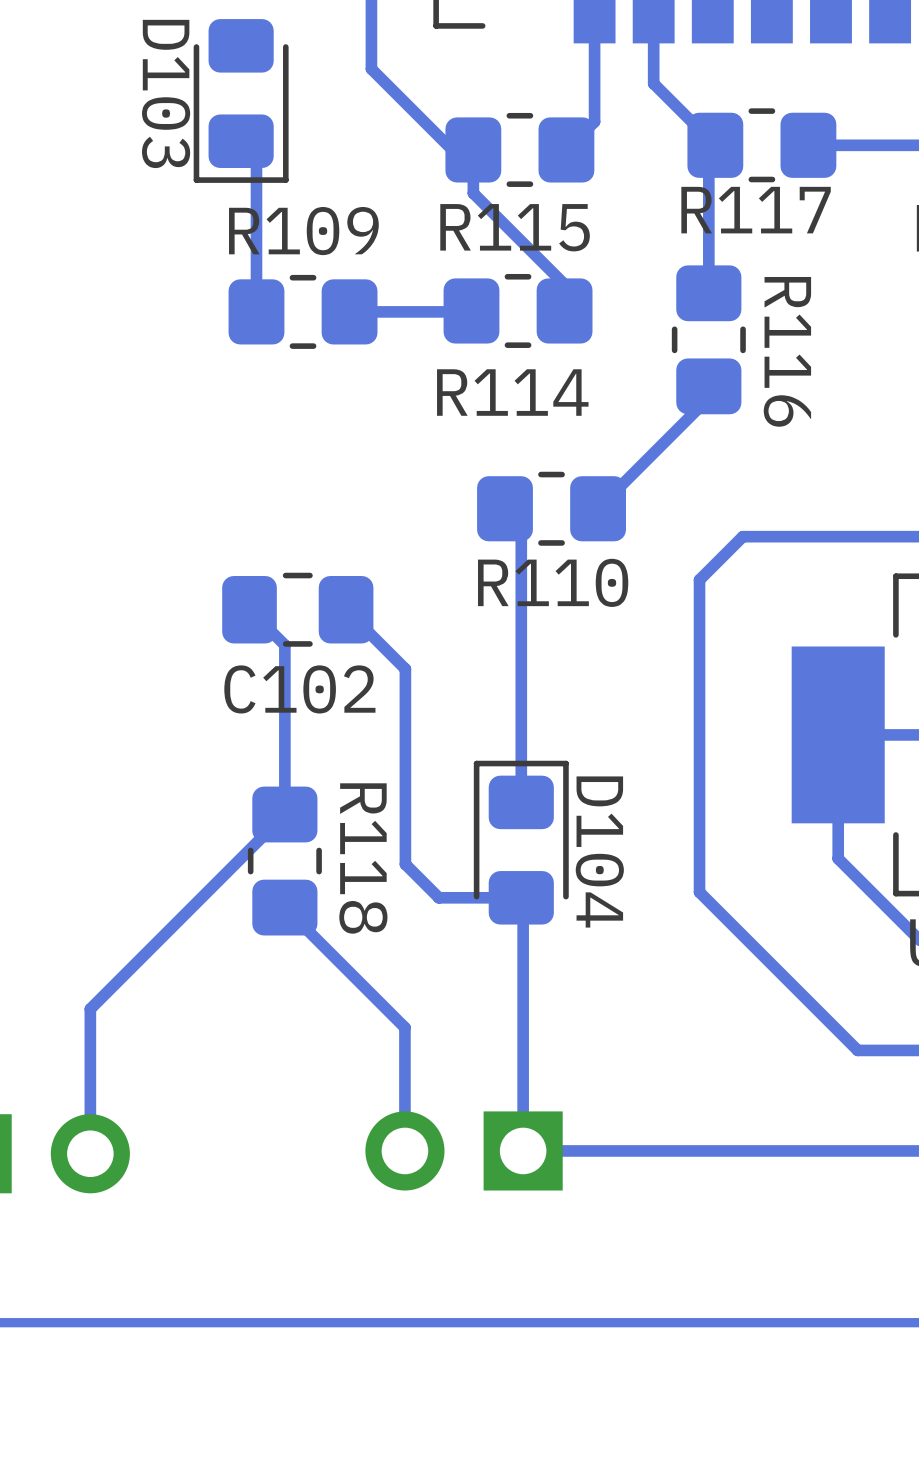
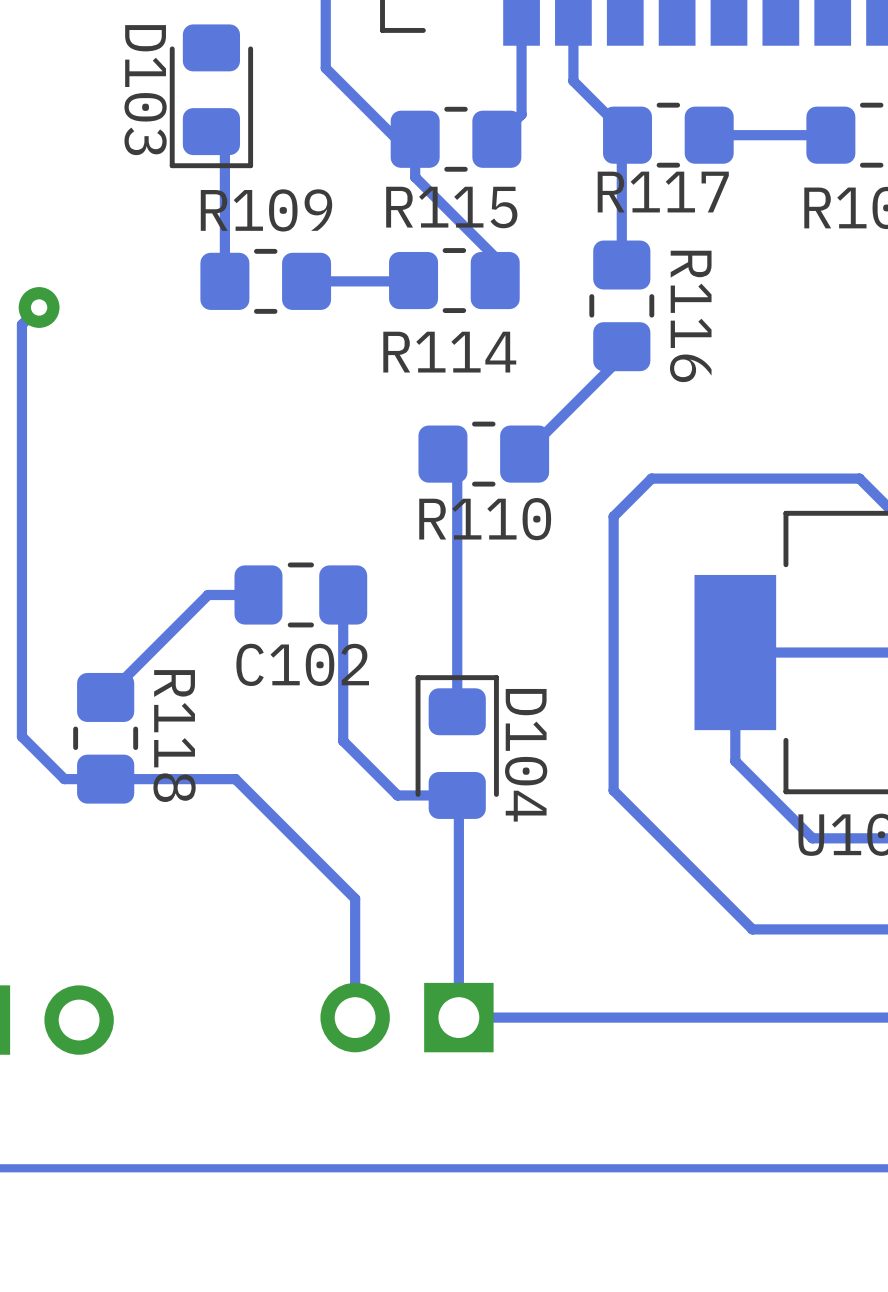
via: none -> (39, 307)
track: (249, 609) (284, 645) (284, 814) (90, 1009) (90, 1153) -> none
C102 position: (297, 609) -> (300, 594)
track: (346, 609) (405, 669) (405, 864) (438, 897) (453, 897) -> (343, 594) (343, 741) (397, 795)
track: none -> (258, 594) (208, 594) (105, 697)
R118 position: (284, 861) -> (105, 738)
track: (284, 907) (404, 1027) -> (39, 307) (21, 324) (21, 736) (64, 779) (235, 779) (355, 898) (355, 909)

